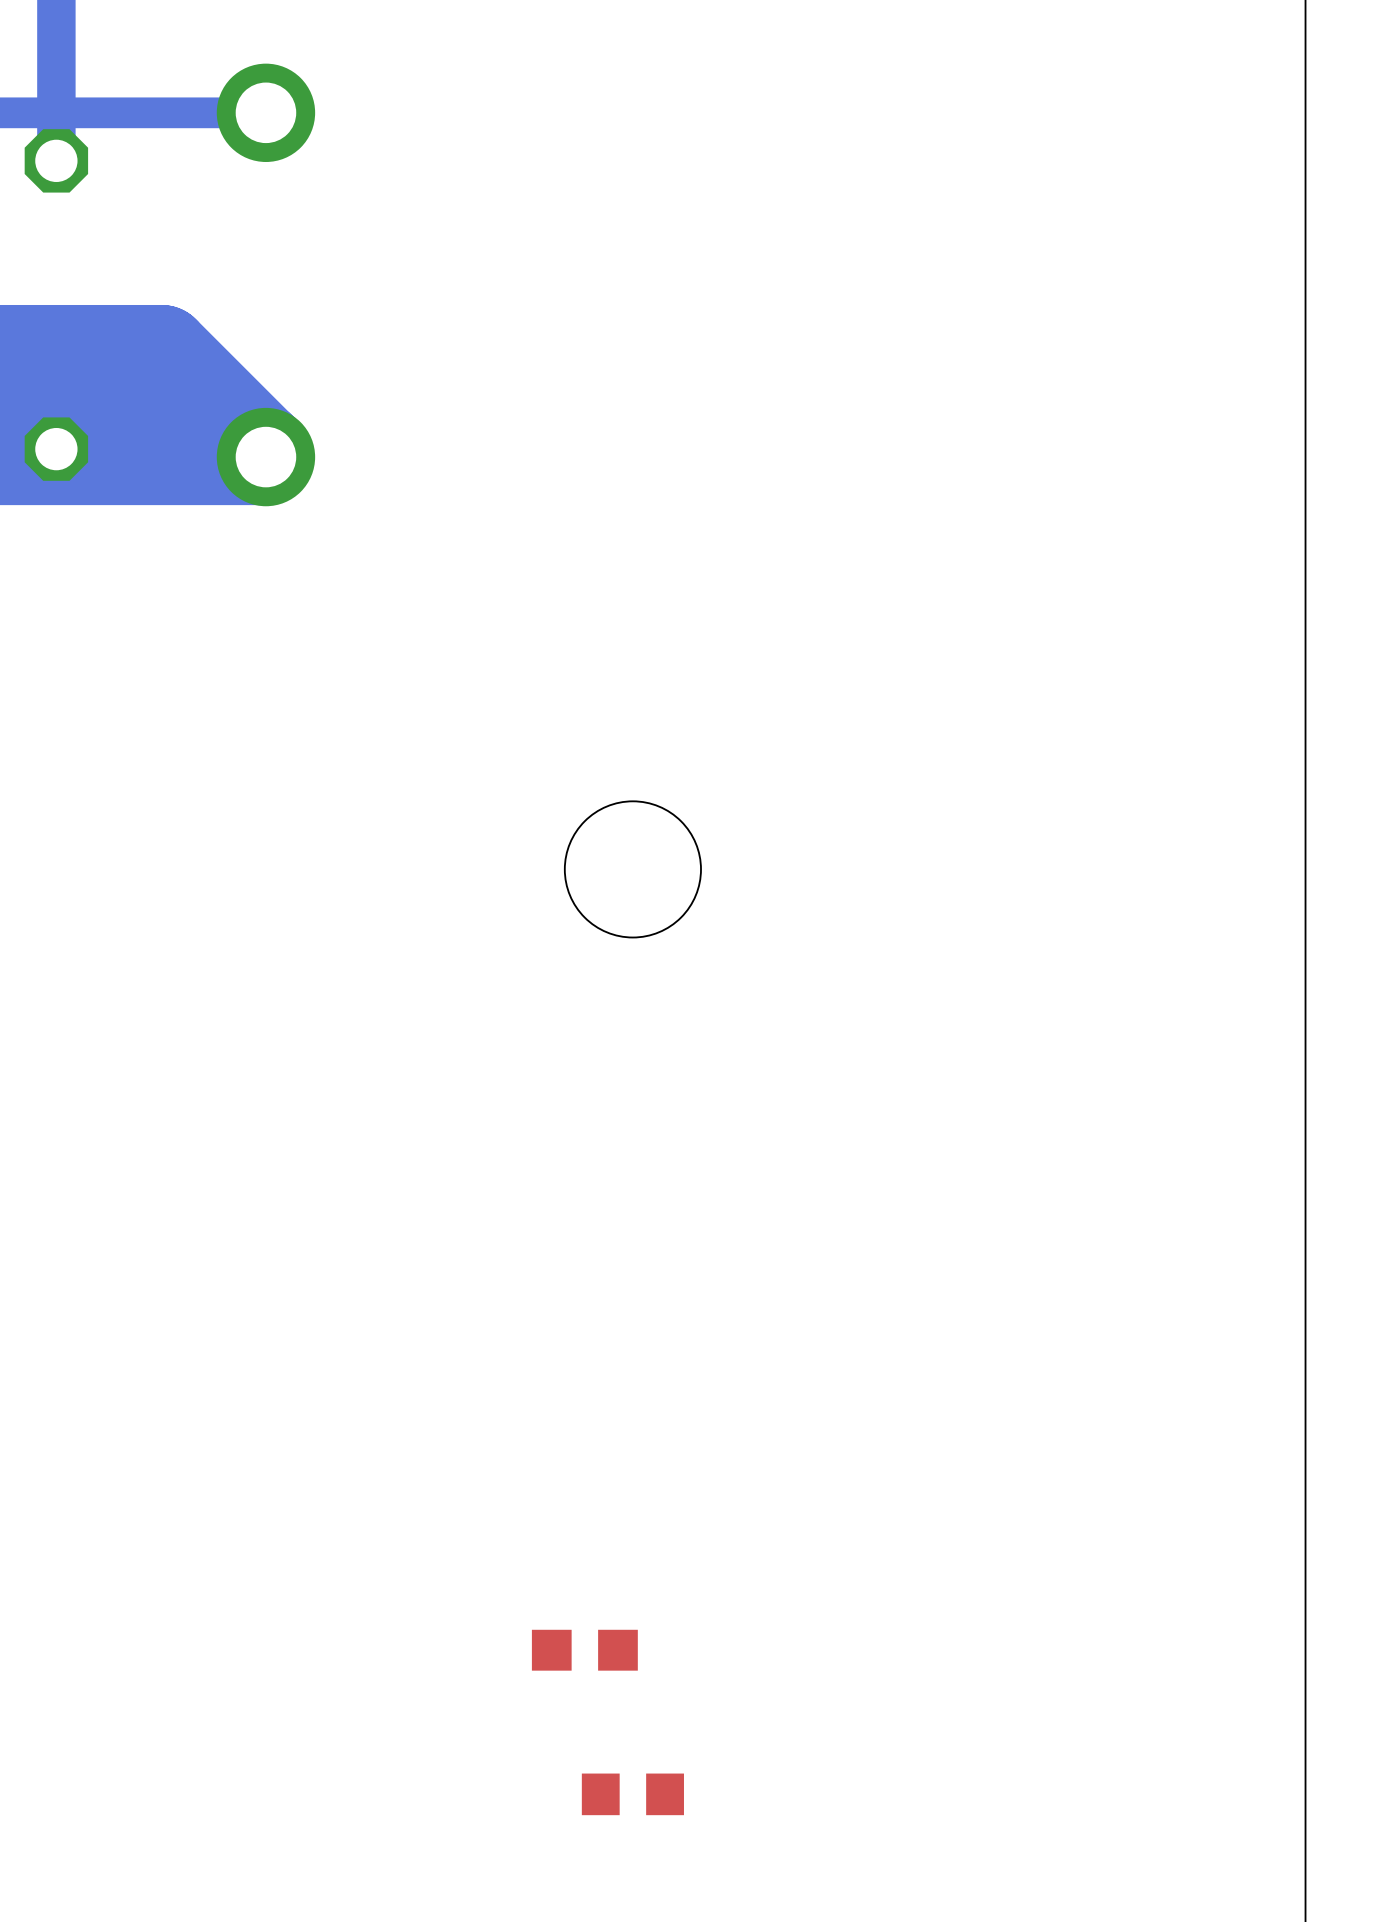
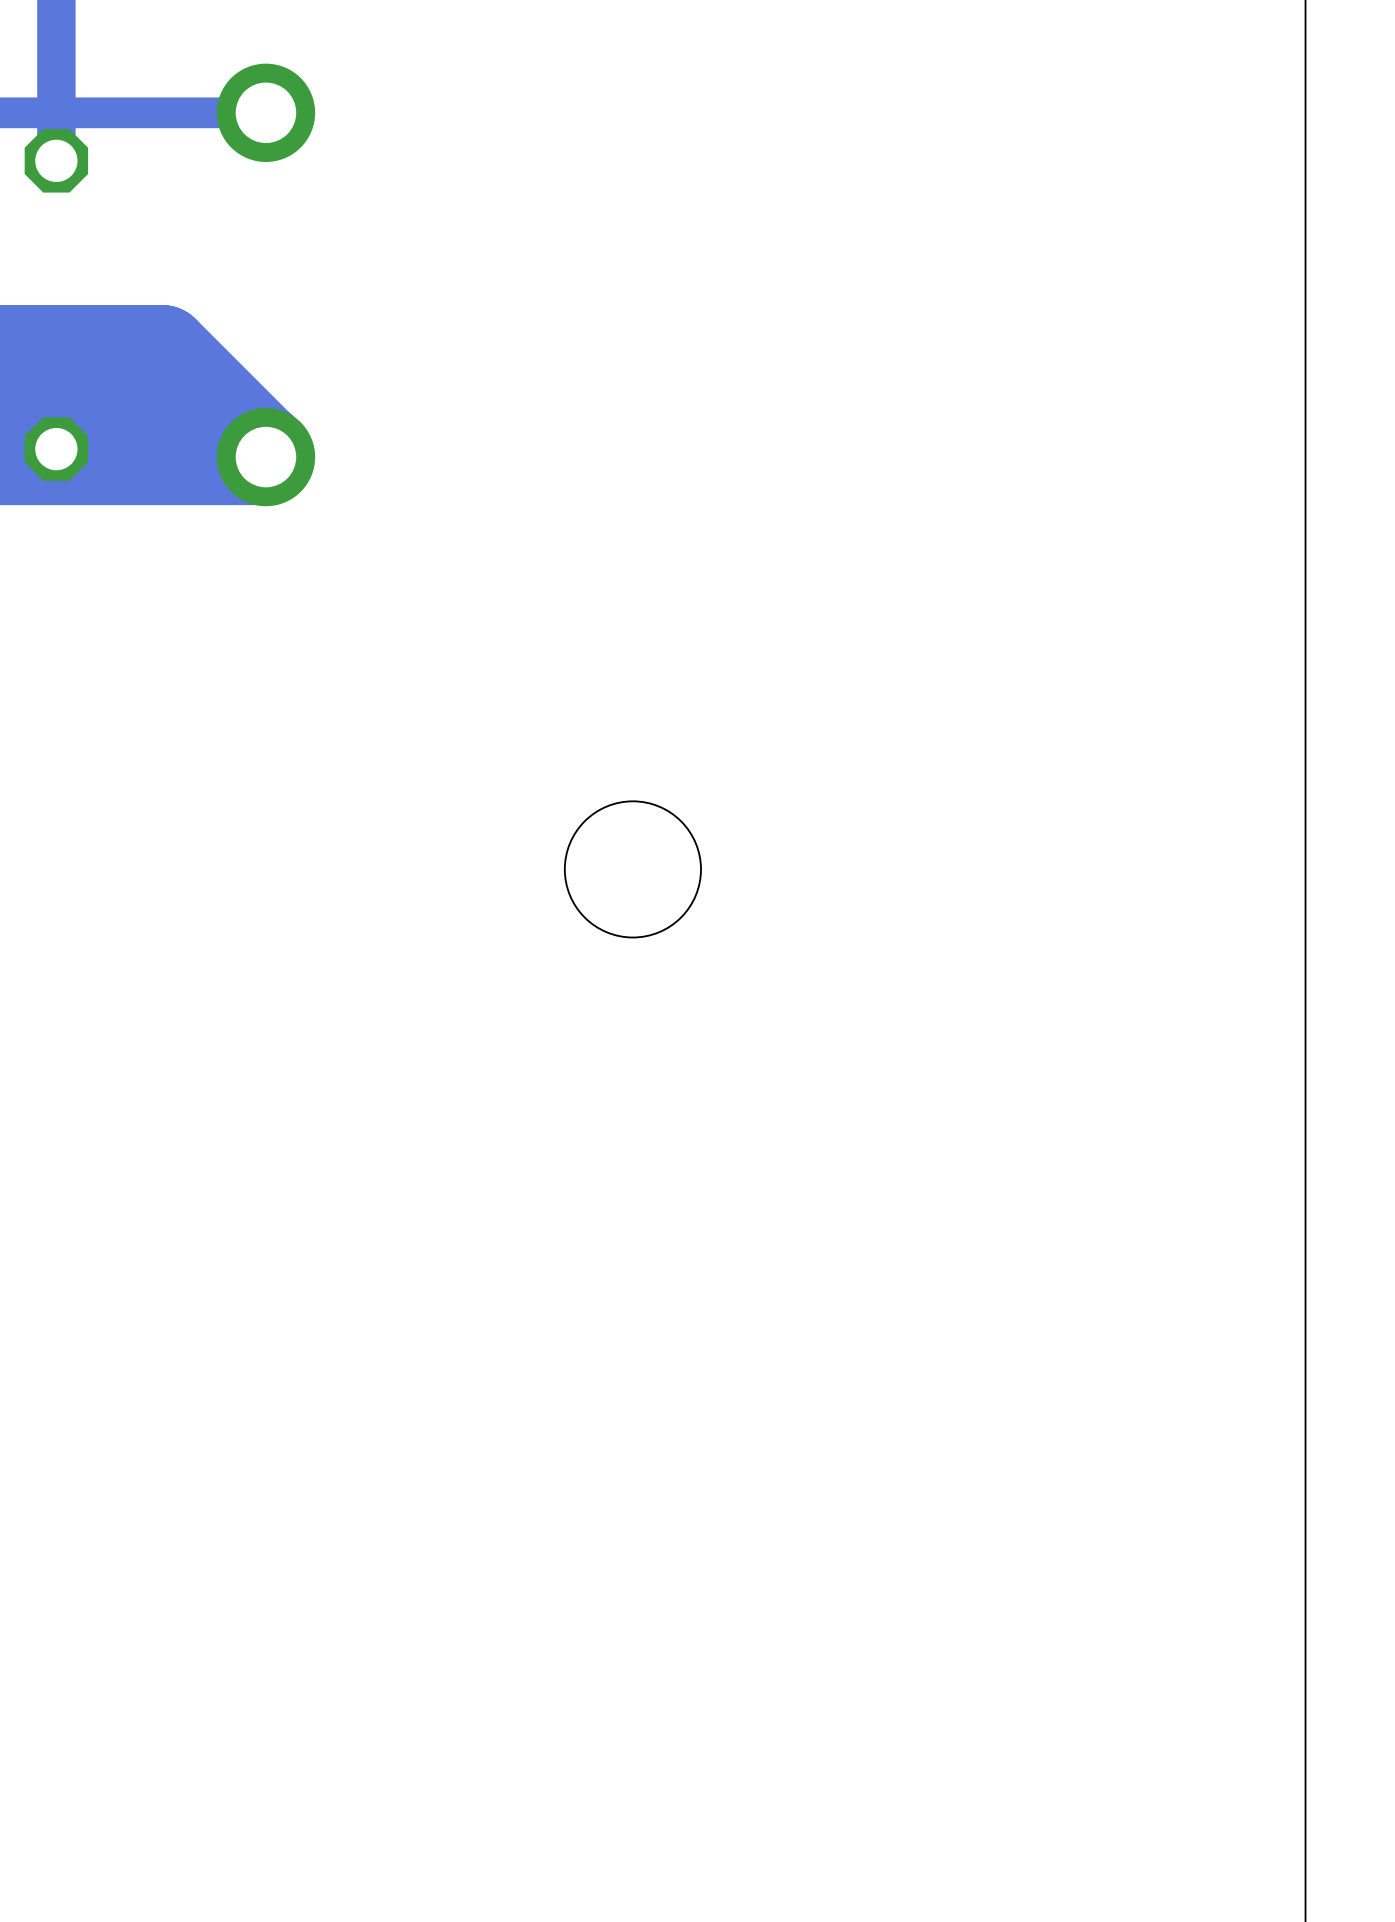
part: (584, 1650) -> none
part: (632, 1794) -> none

